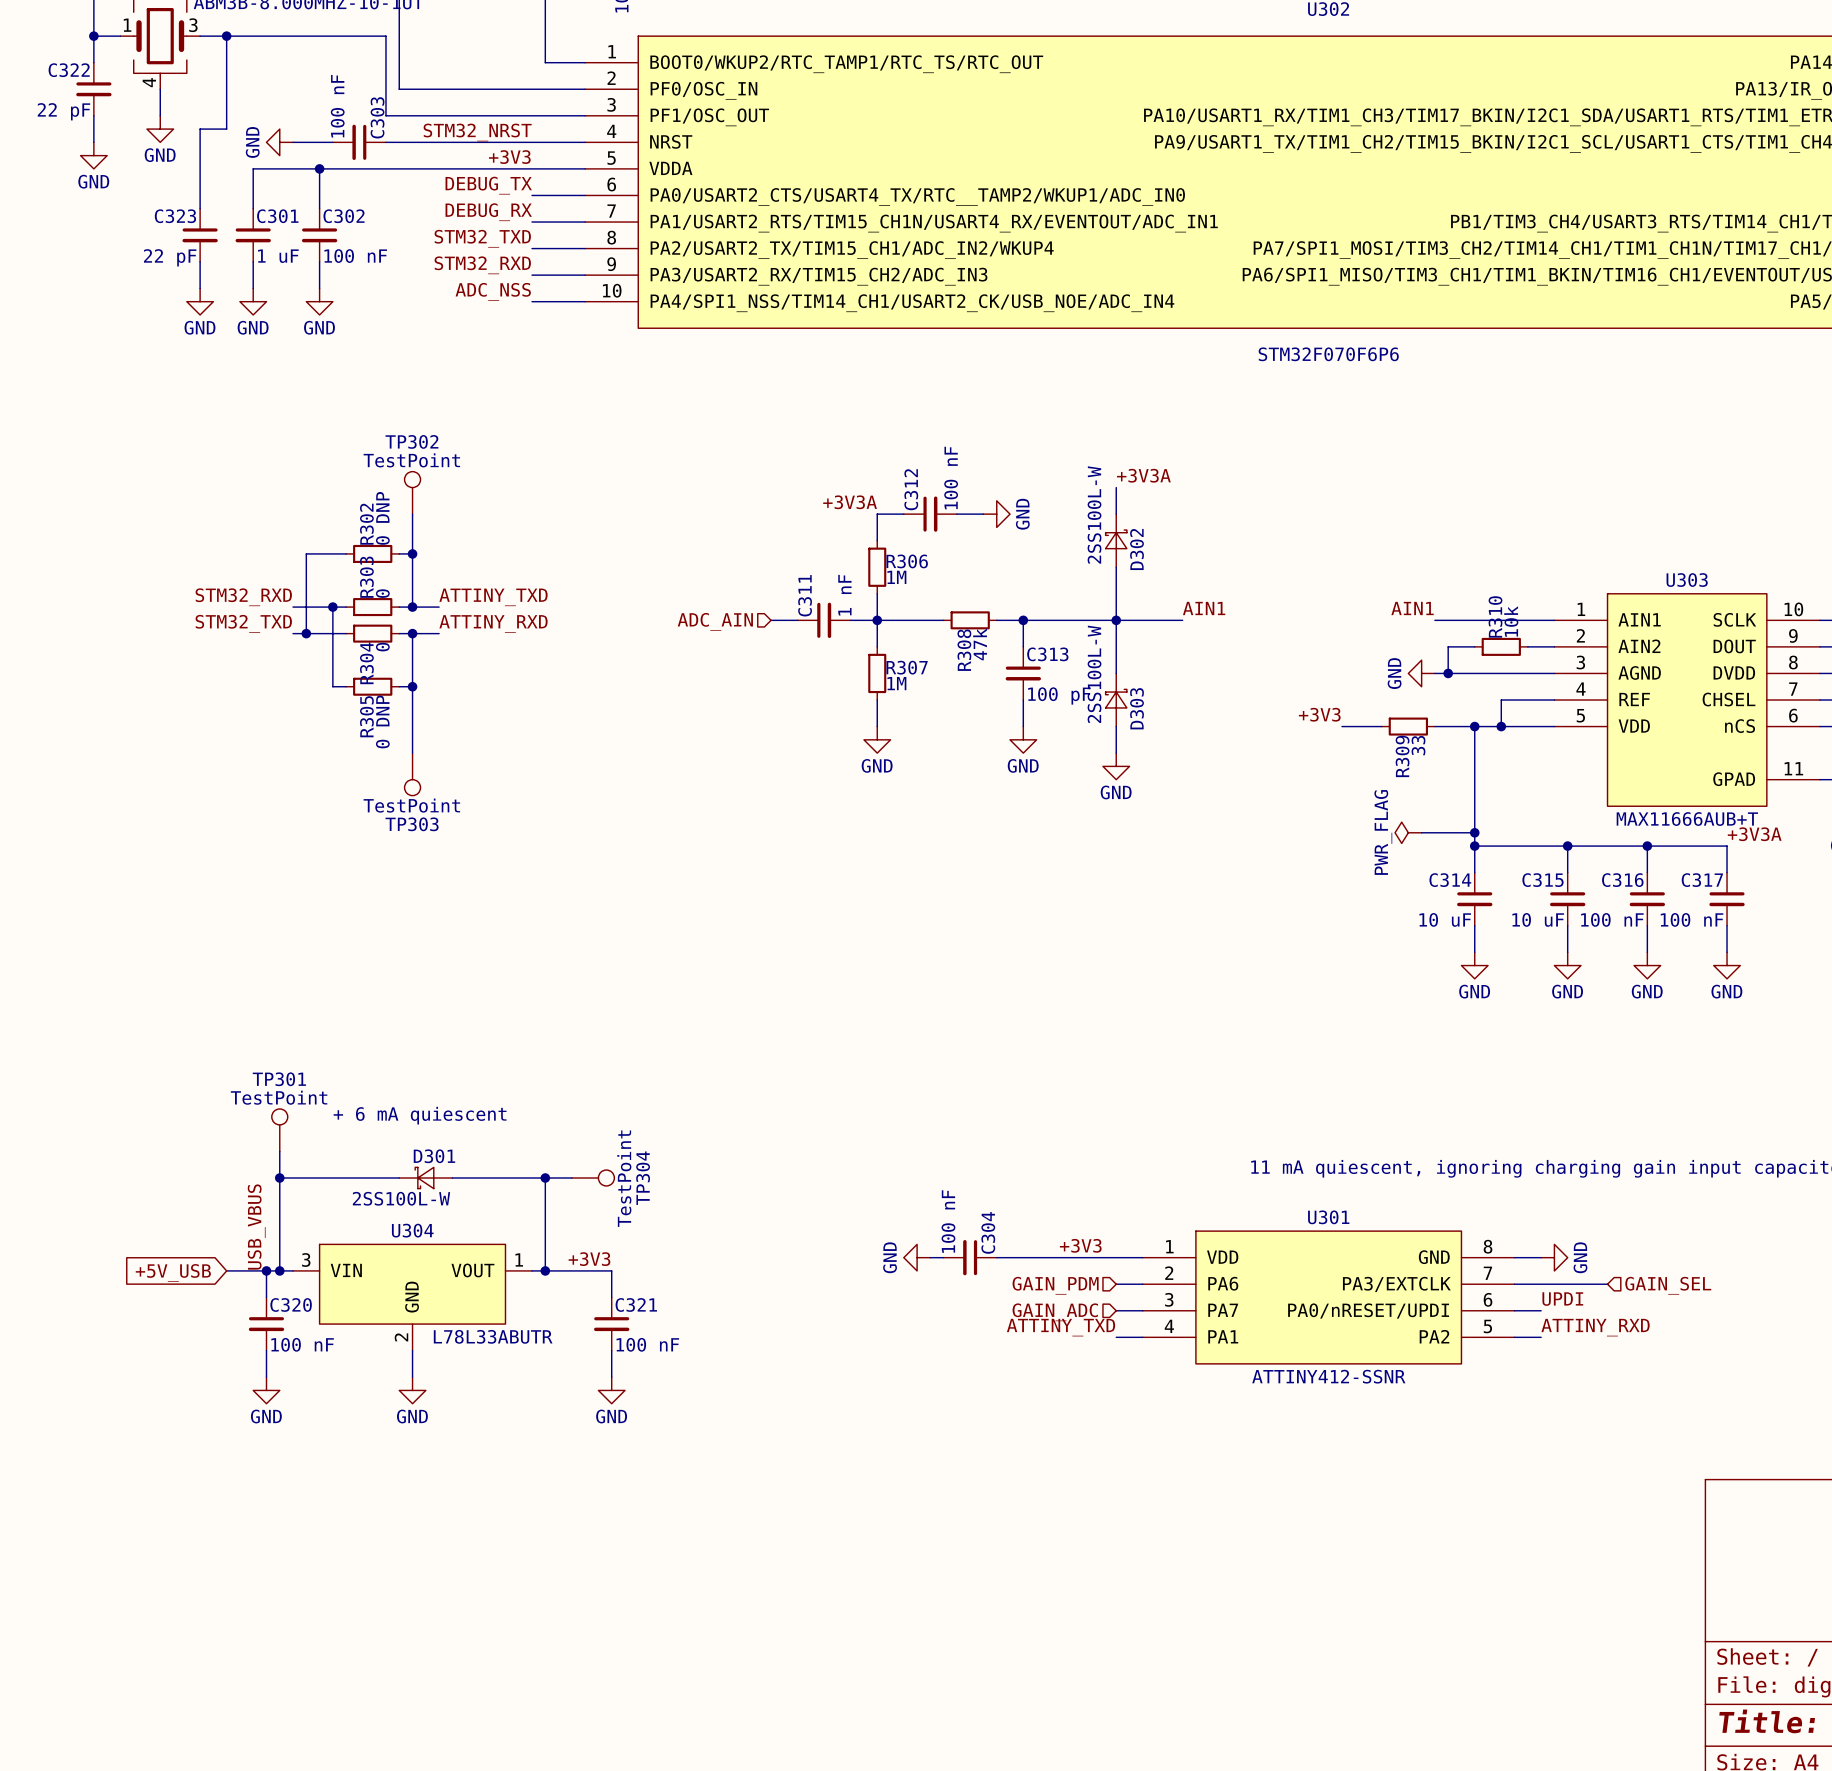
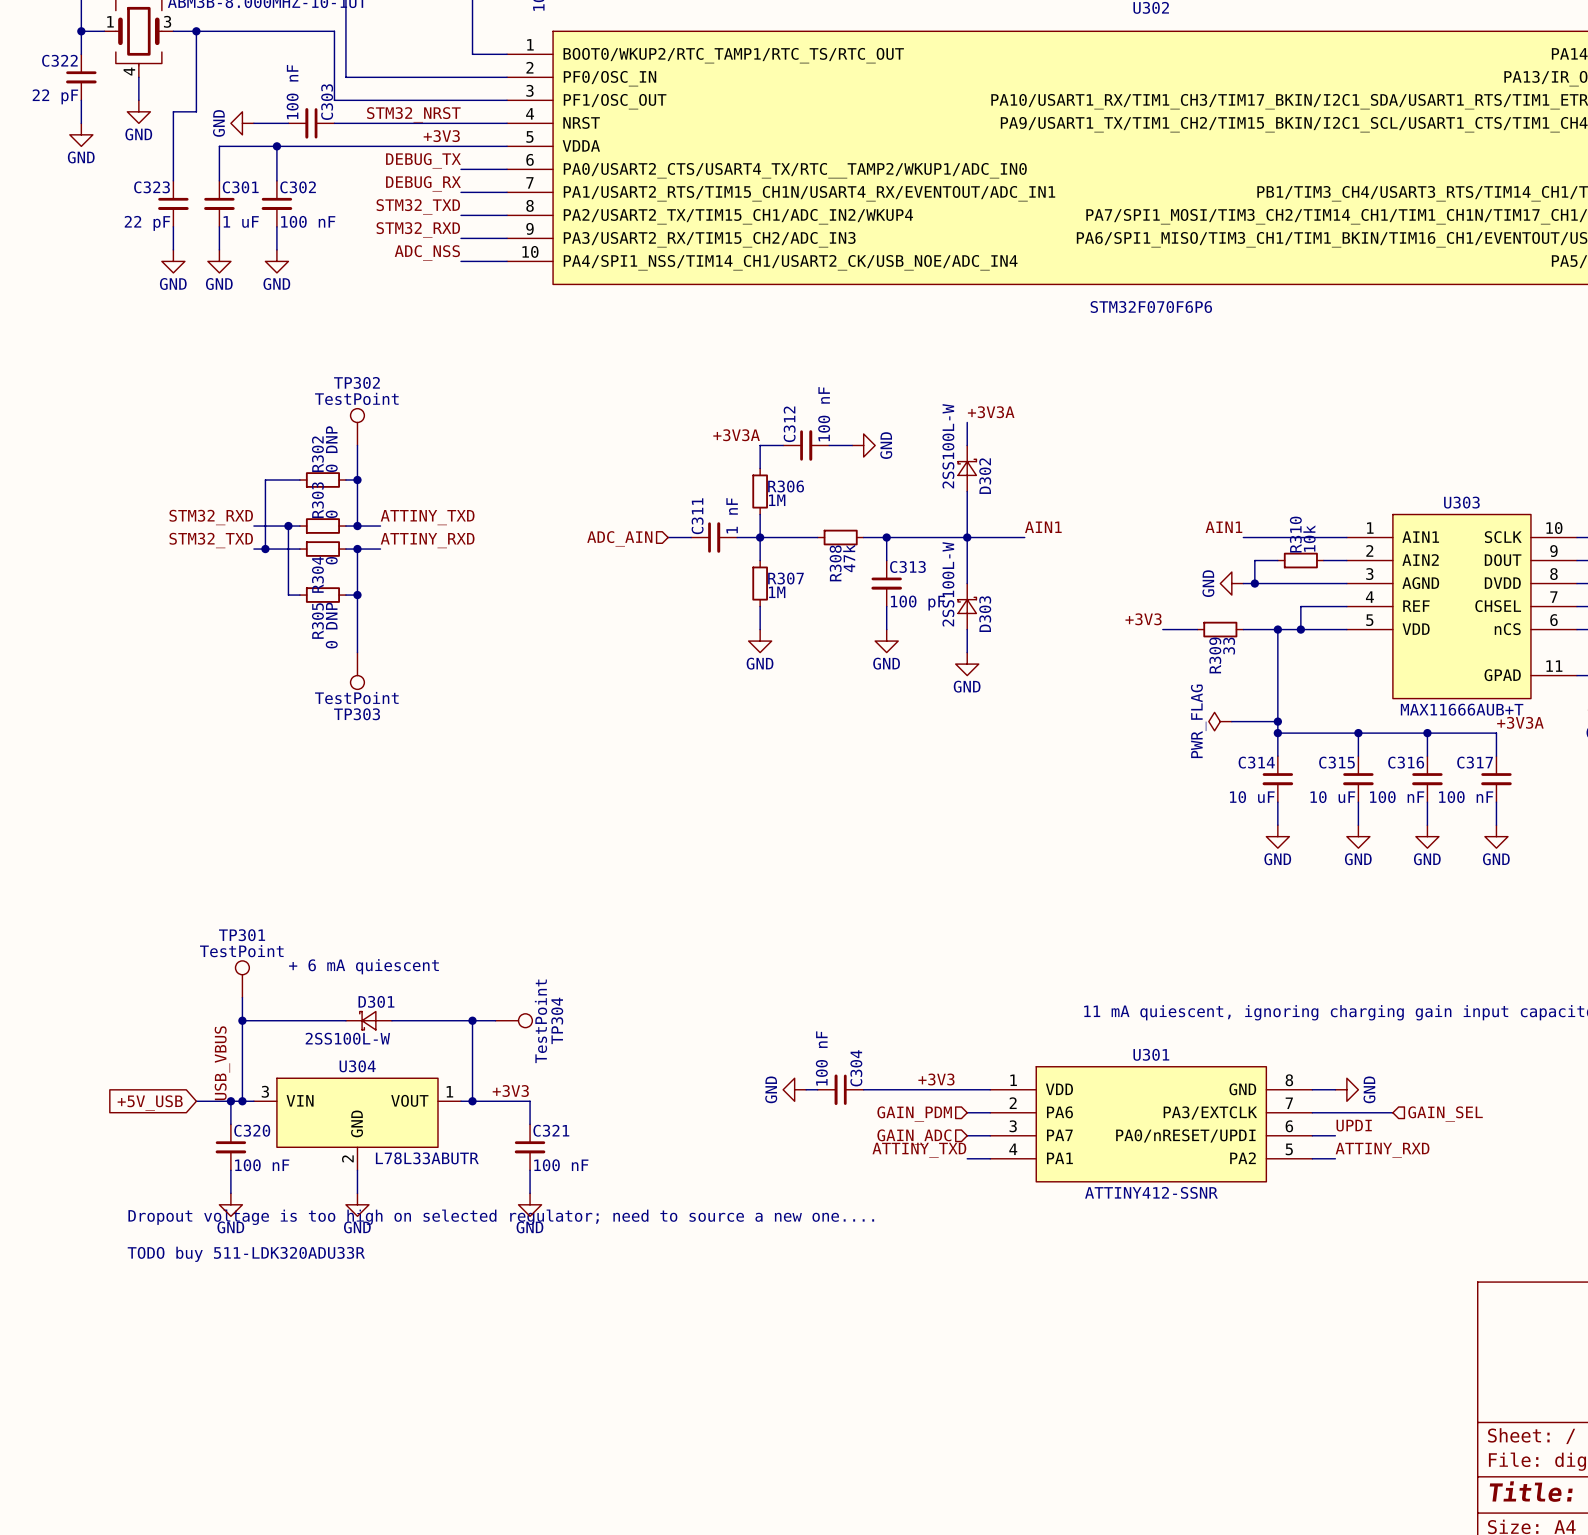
text: none -> Dropout voltage is too high on selected regulator; need to source a new one.... (501, 1217)
text: none -> TODO buy 511-LDK320ADU33R (246, 1254)

